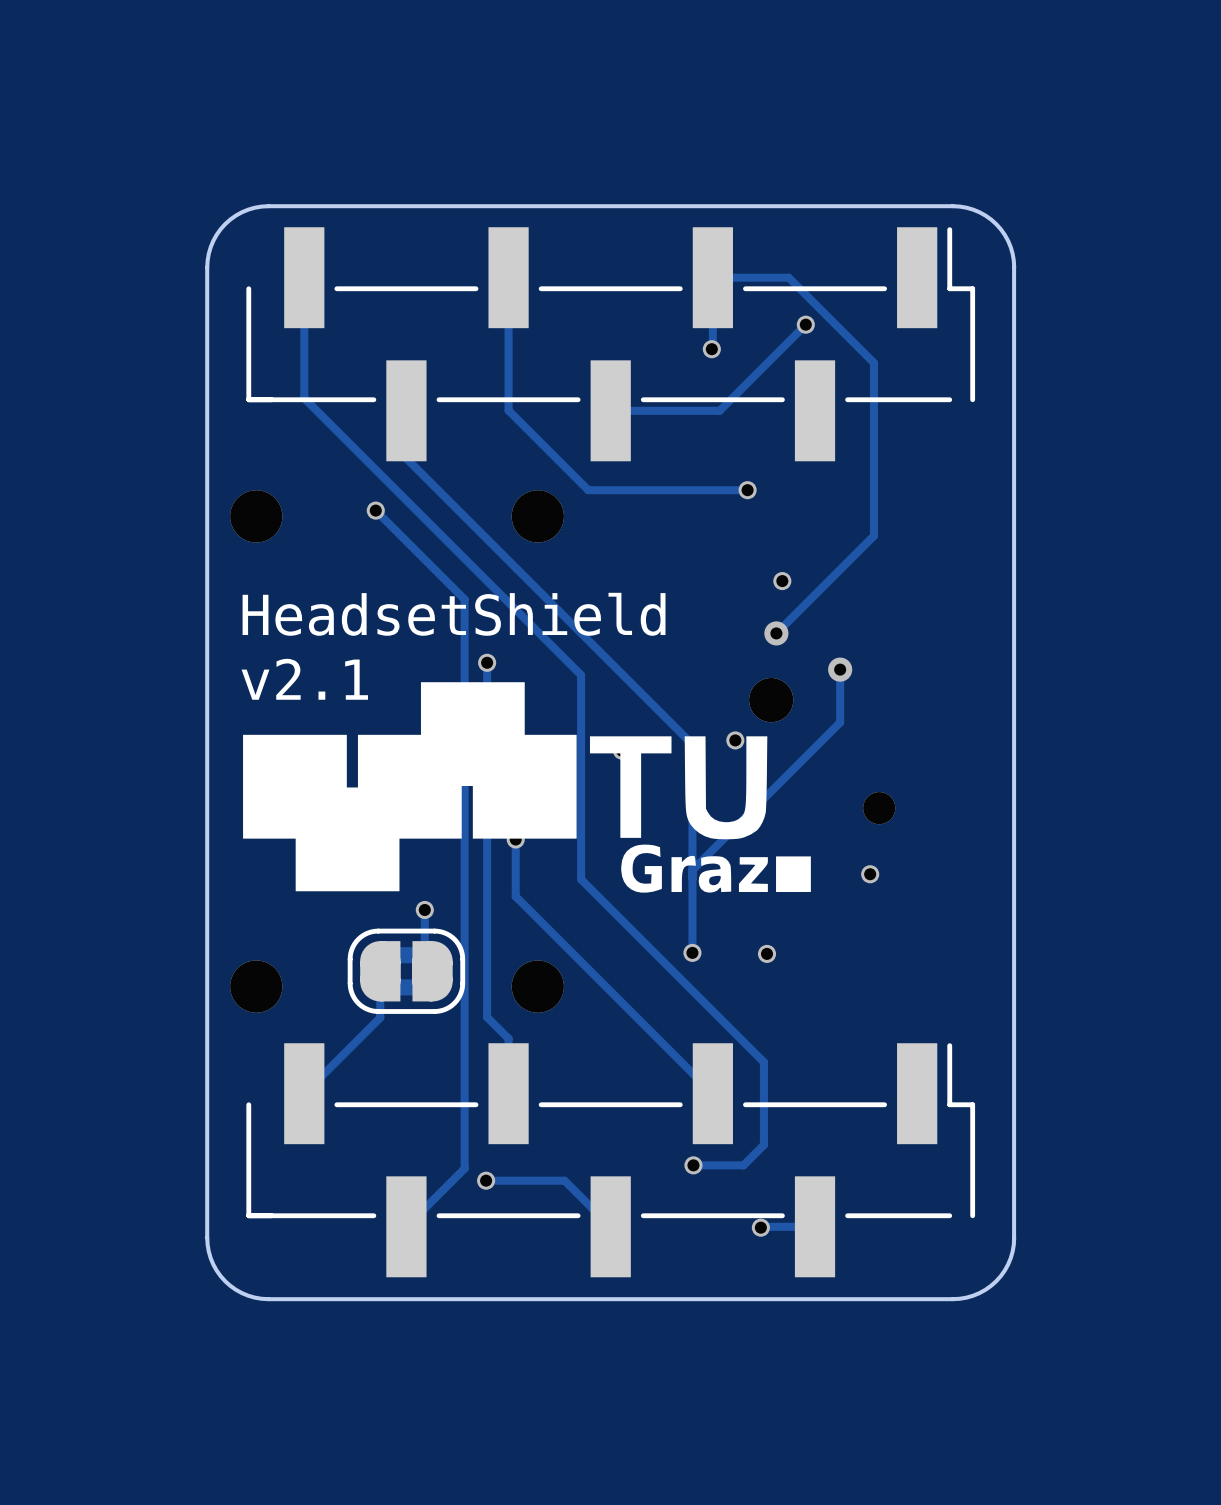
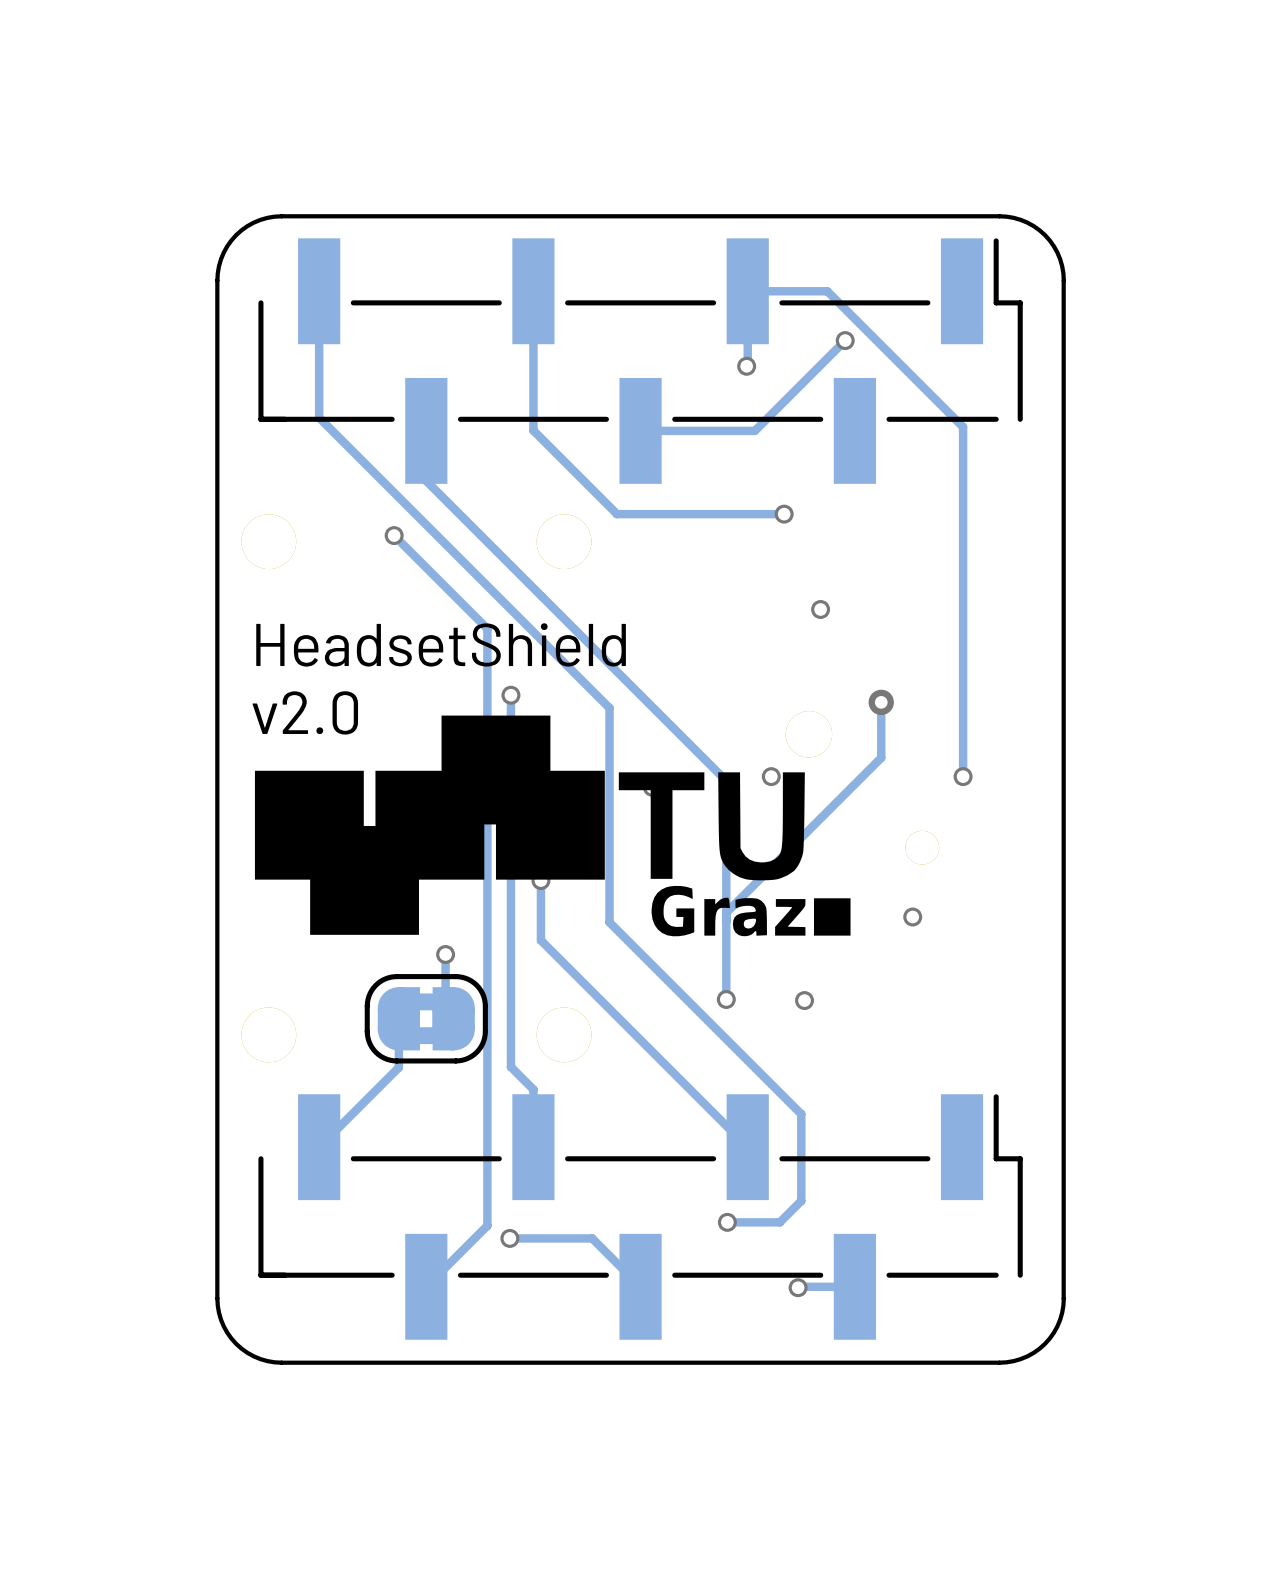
track: (873, 362) (873, 535) (776, 633) -> (916, 380) (963, 427) (963, 776)
via: (776, 633) -> none
text: v2.1 (304, 679) -> v2.0 (305, 712)
via: none -> (963, 776)

